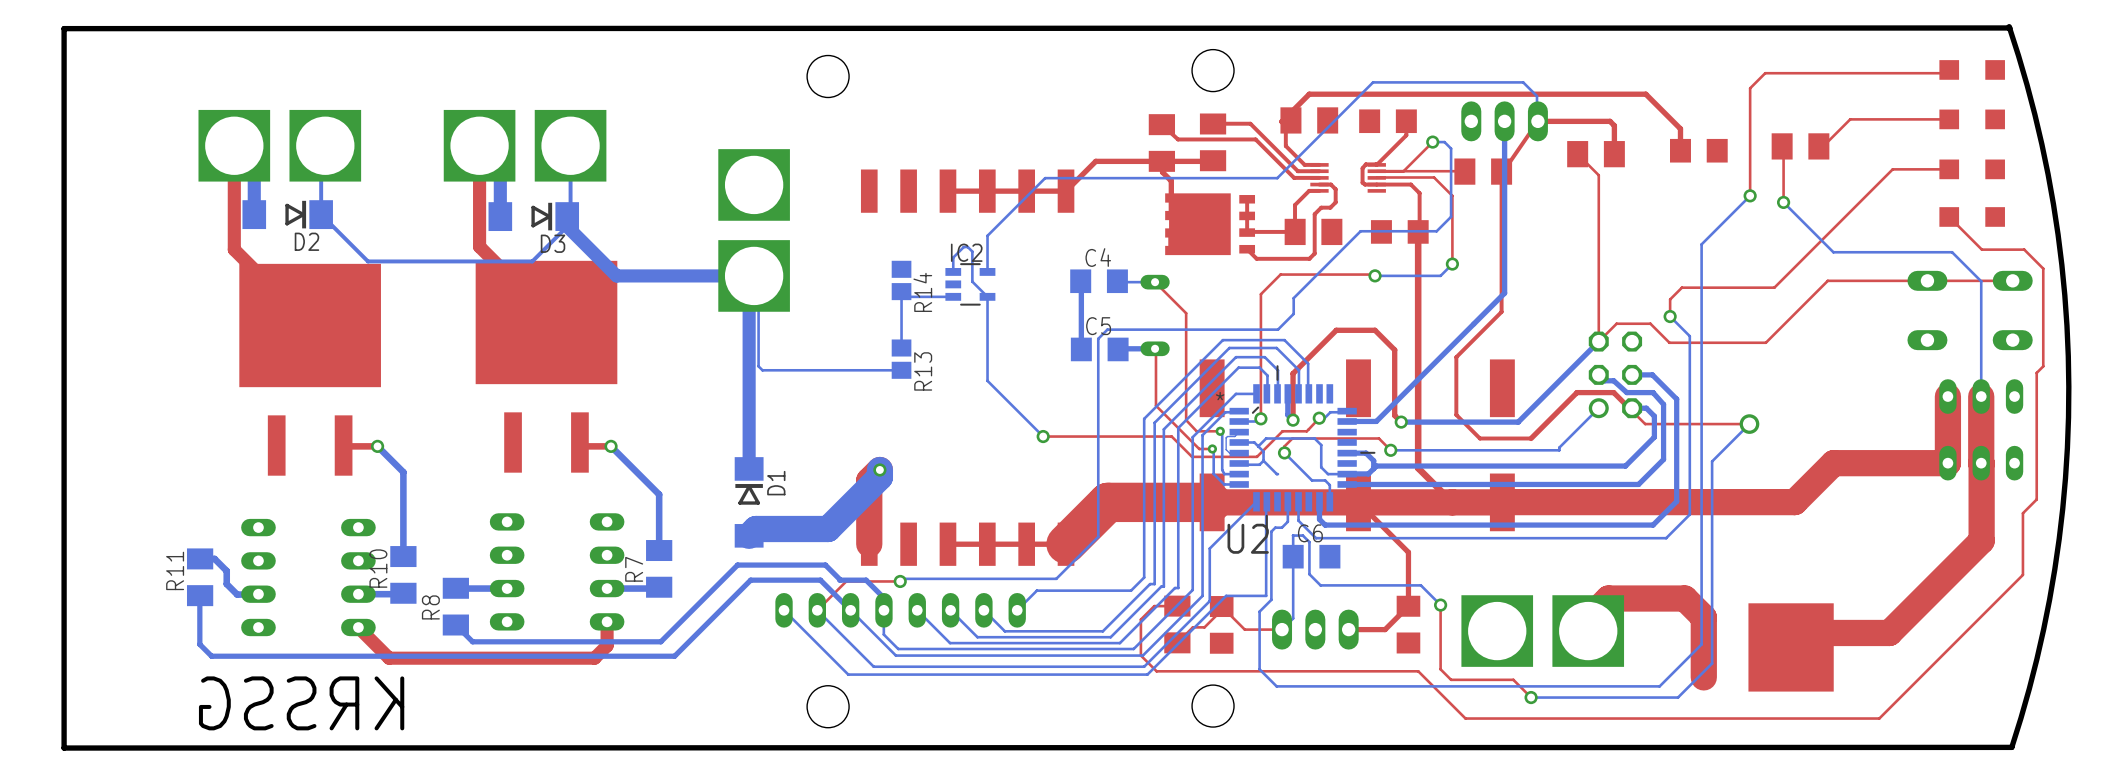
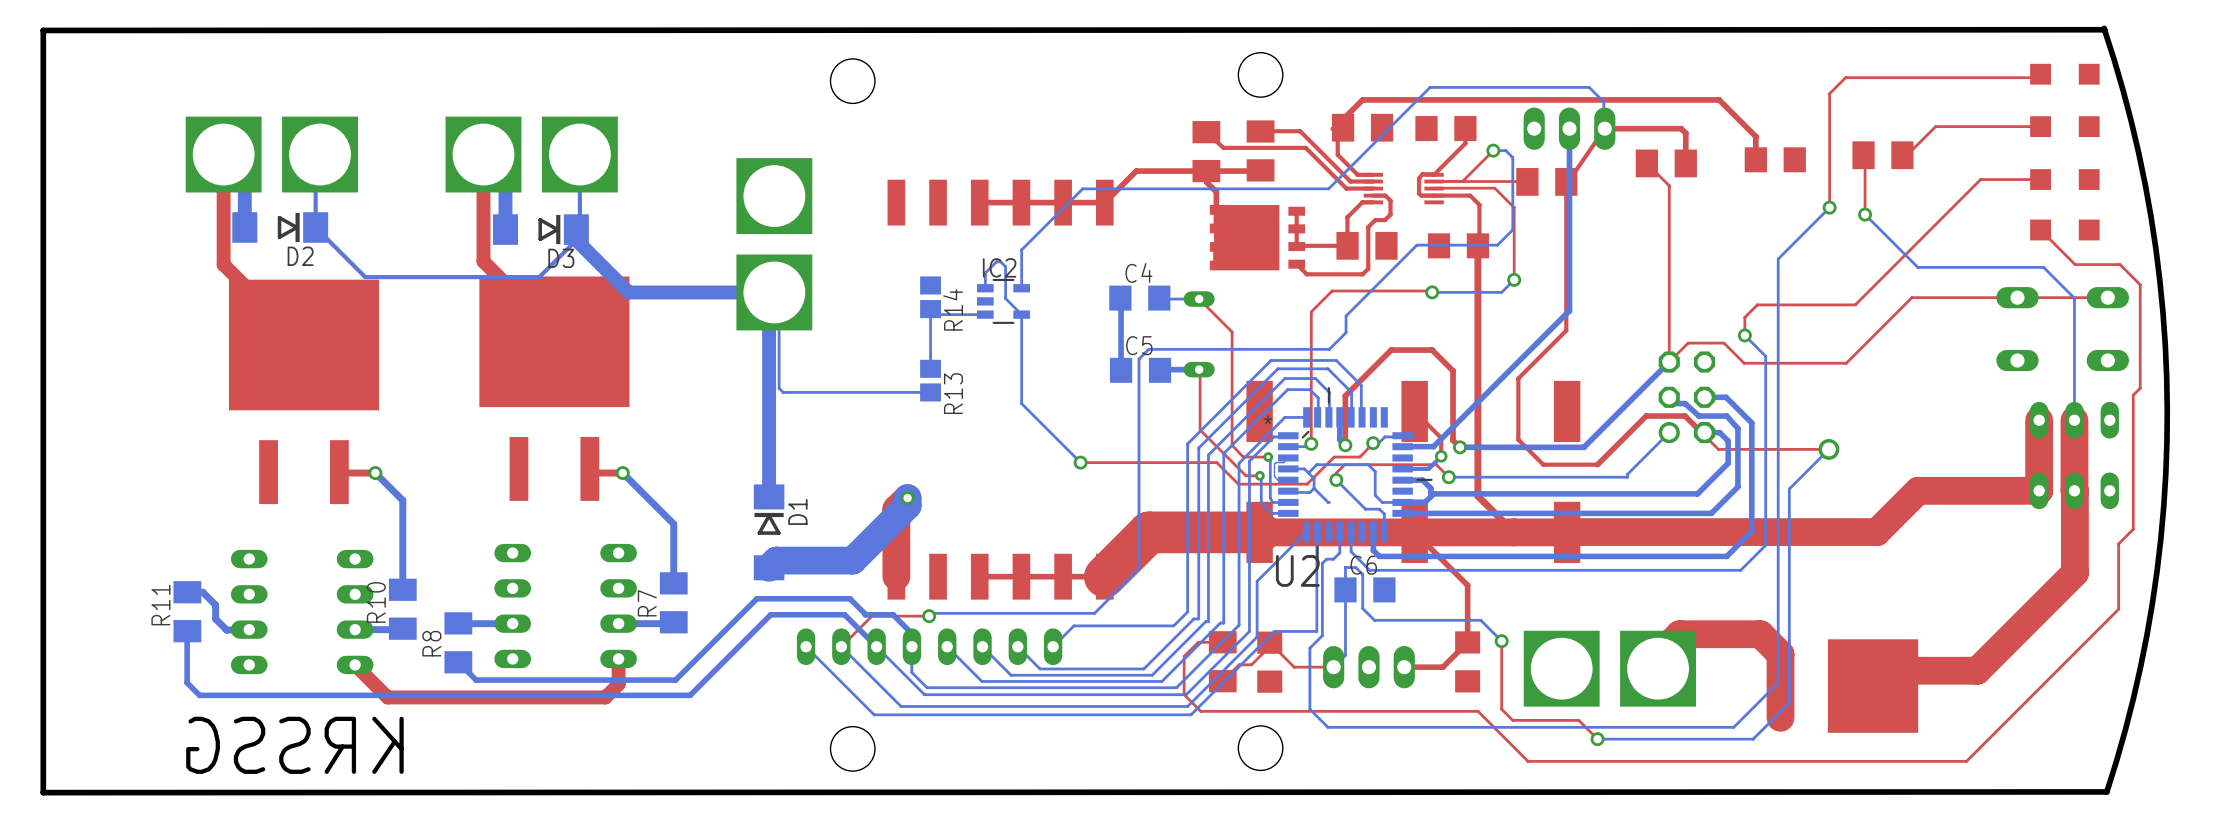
top track: none -> (1414, 411) (1441, 438) (1441, 456)
bottom track: none -> (1441, 456) (1428, 468) (1402, 468)
via: none -> (1441, 456)

